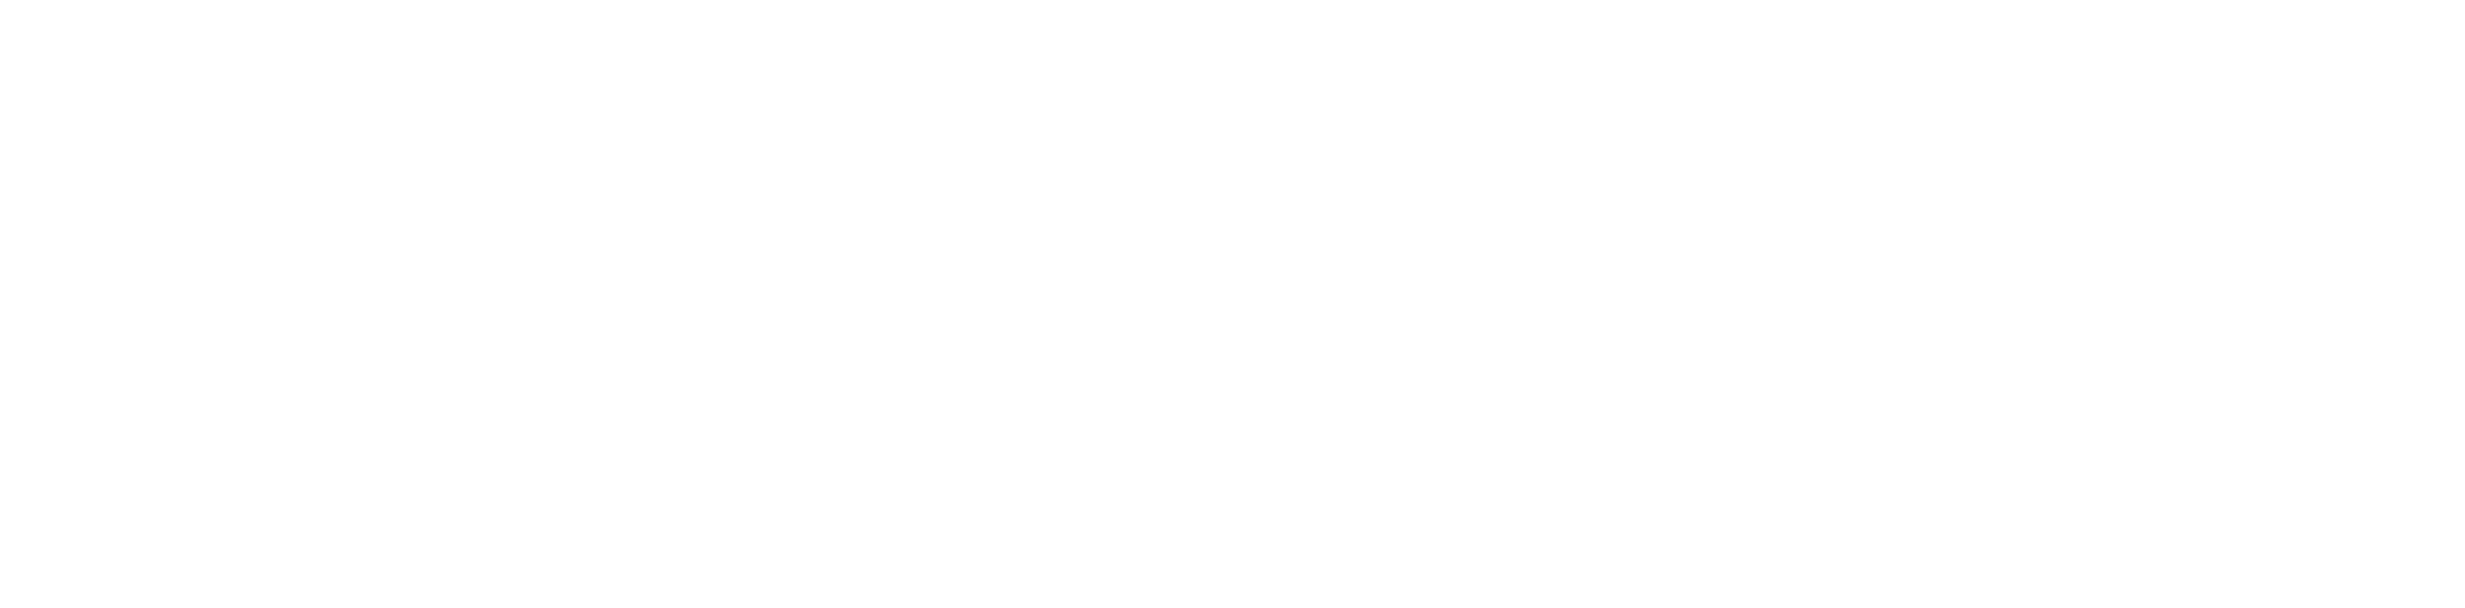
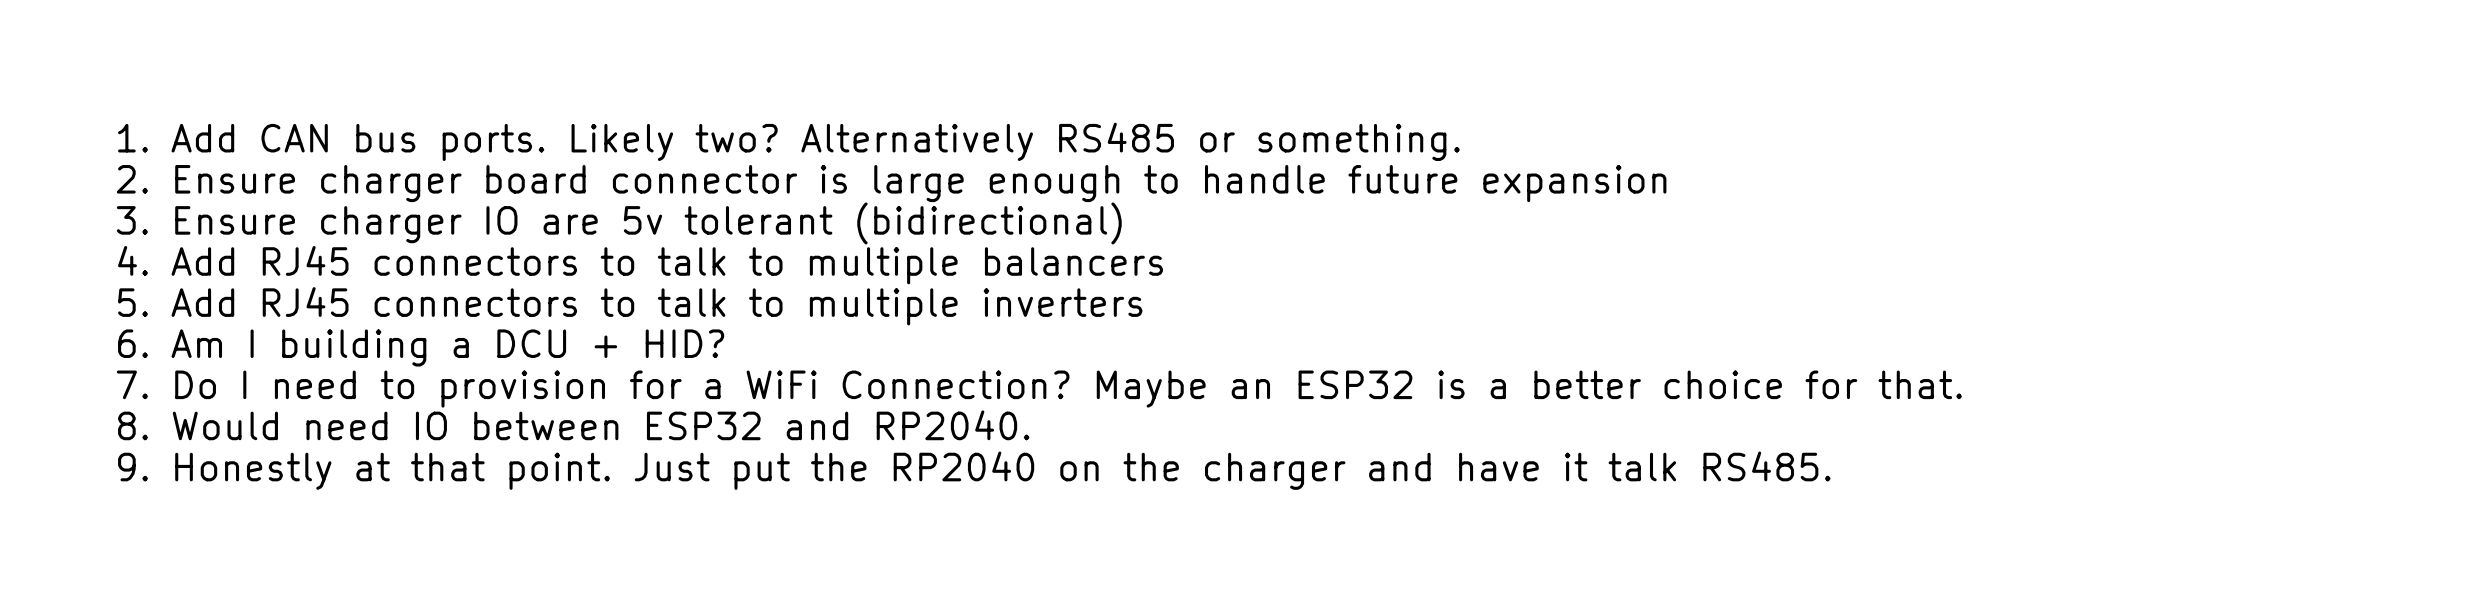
text: none -> 1. Add CAN bus ports. Likely two? Alternatively RS485 or something. (788, 141)
text: none -> 2. Ensure charger board connector is large enough to handle future expansion (891, 183)
text: none -> 3. Ensure charger IO are 5v tolerant (bidirectional) (619, 223)
text: none -> 4. Add RJ45 connectors to talk to multiple balancers (640, 265)
text: none -> 5. Add RJ45 connectors to talk to multiple inverters (630, 306)
text: none -> 6. Am I building a DCU + HID? (421, 347)
text: none -> 7. Do I need to provision for a WiFi Connection? Maybe an ESP32 is a better choice for that. (1039, 389)
text: none -> 8. Would need IO between ESP32 and RP2040. (573, 425)
text: none -> 9. Honestly at that point. Just put the RP2040 on the charger and have it talk RS485. (974, 470)

